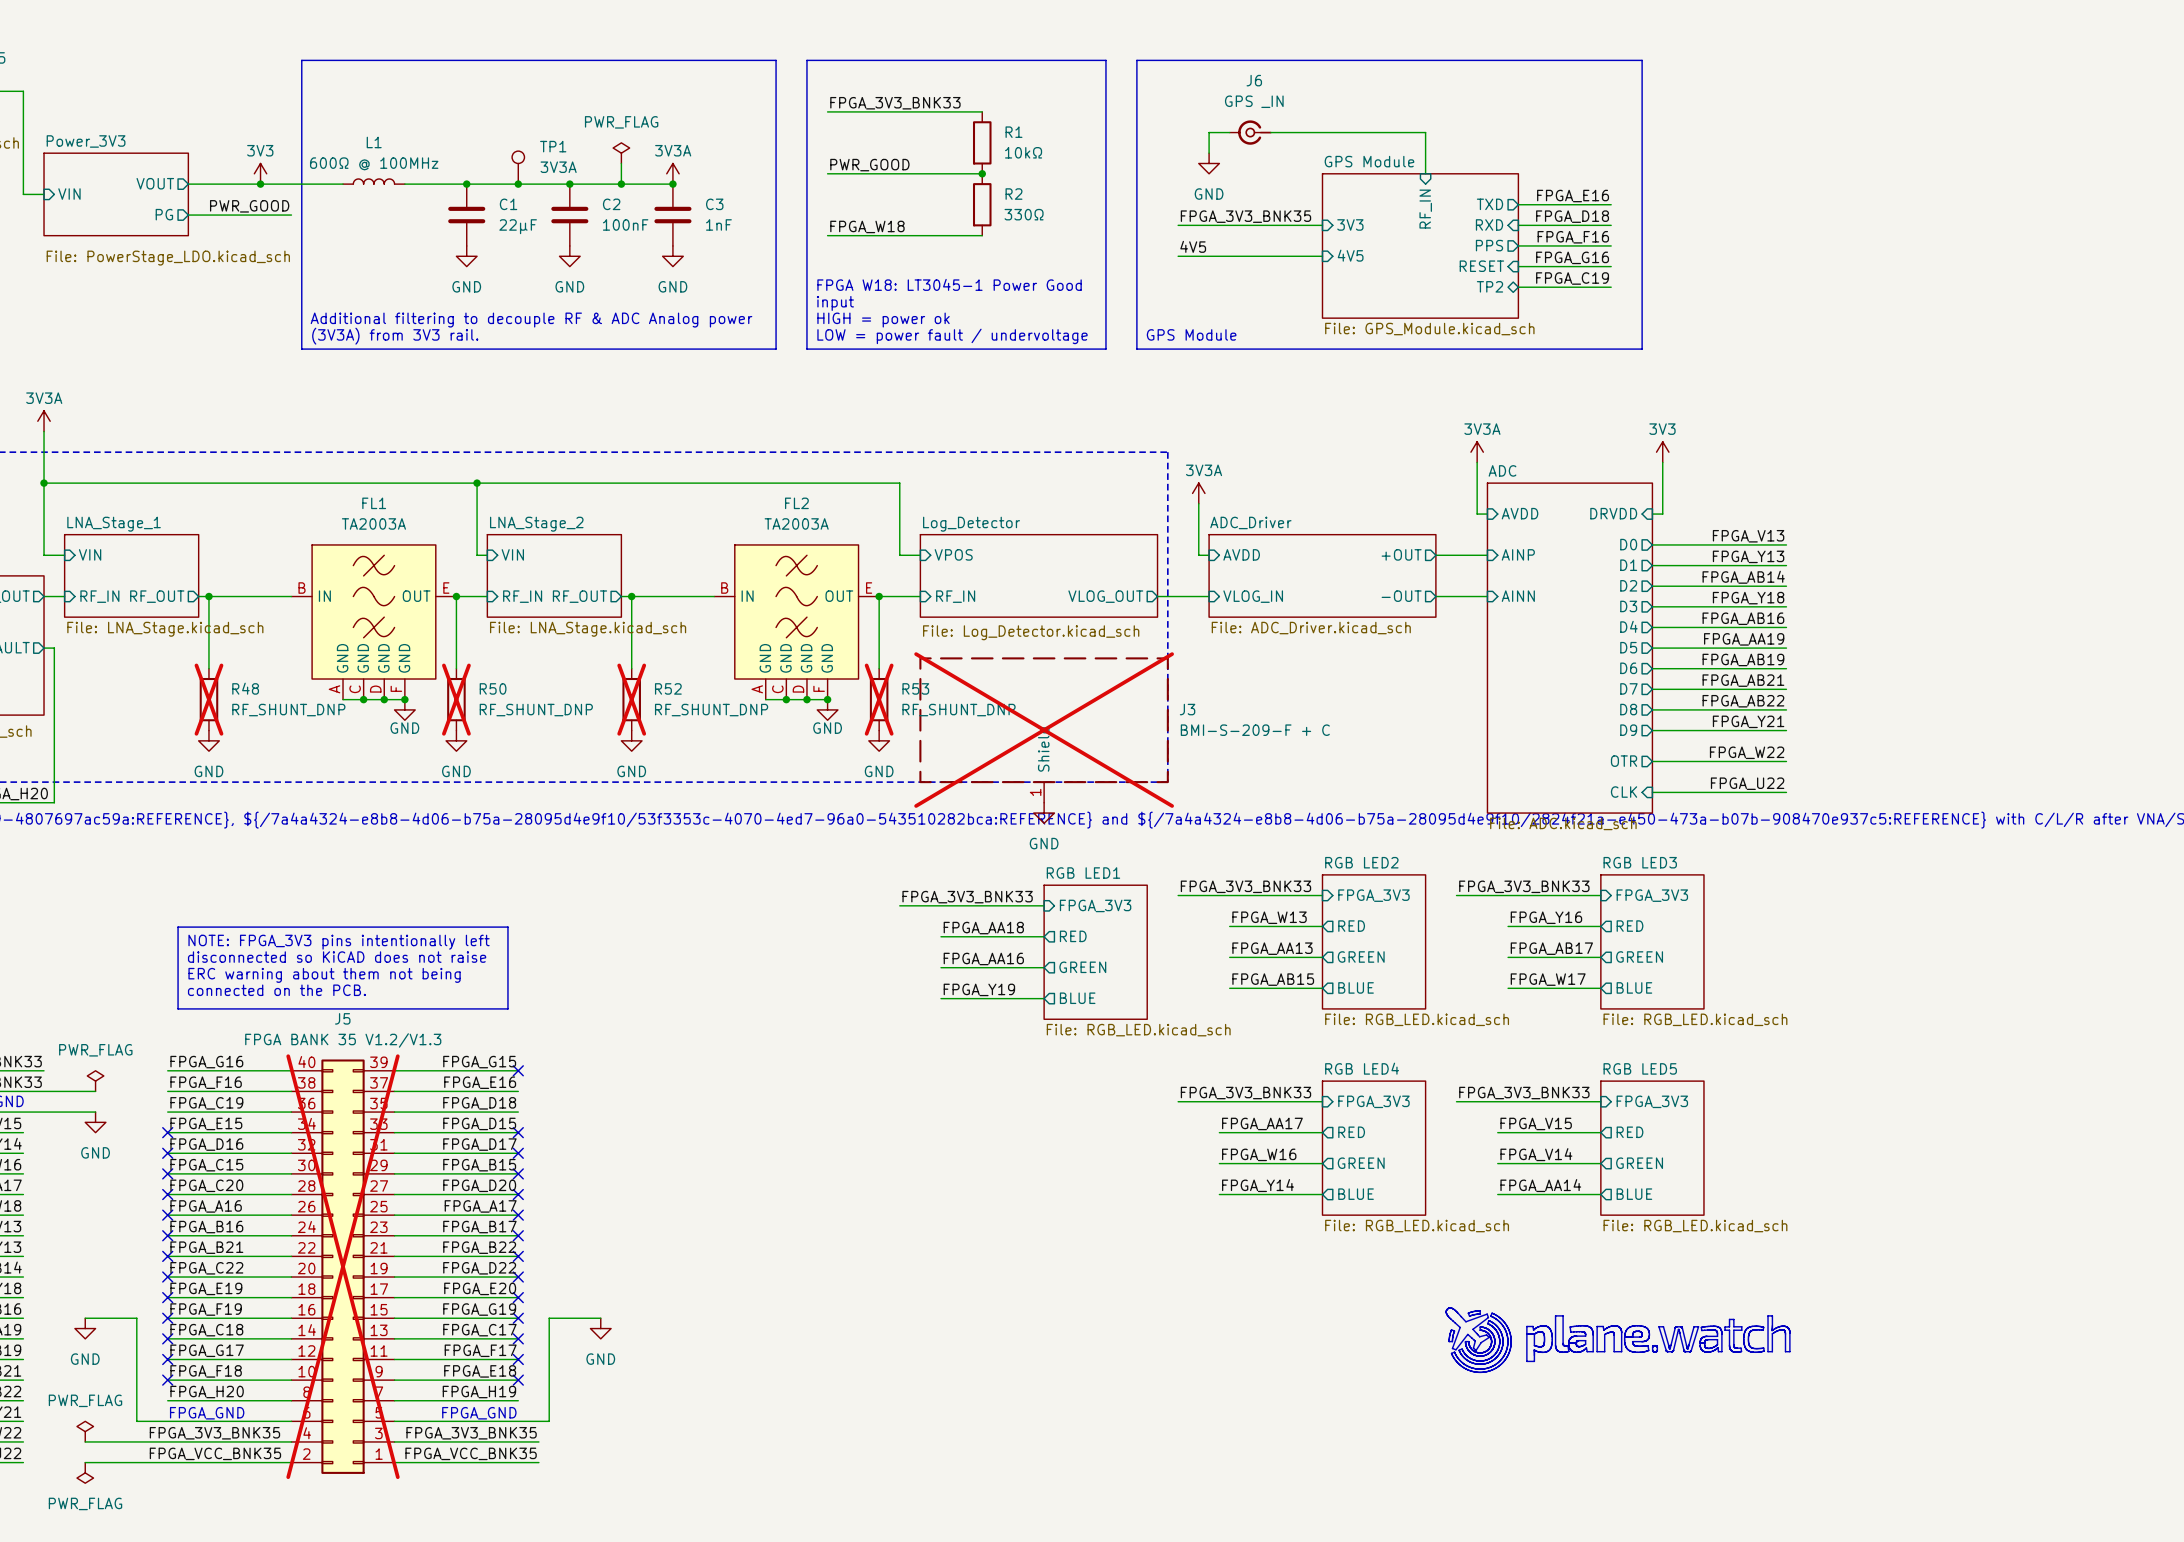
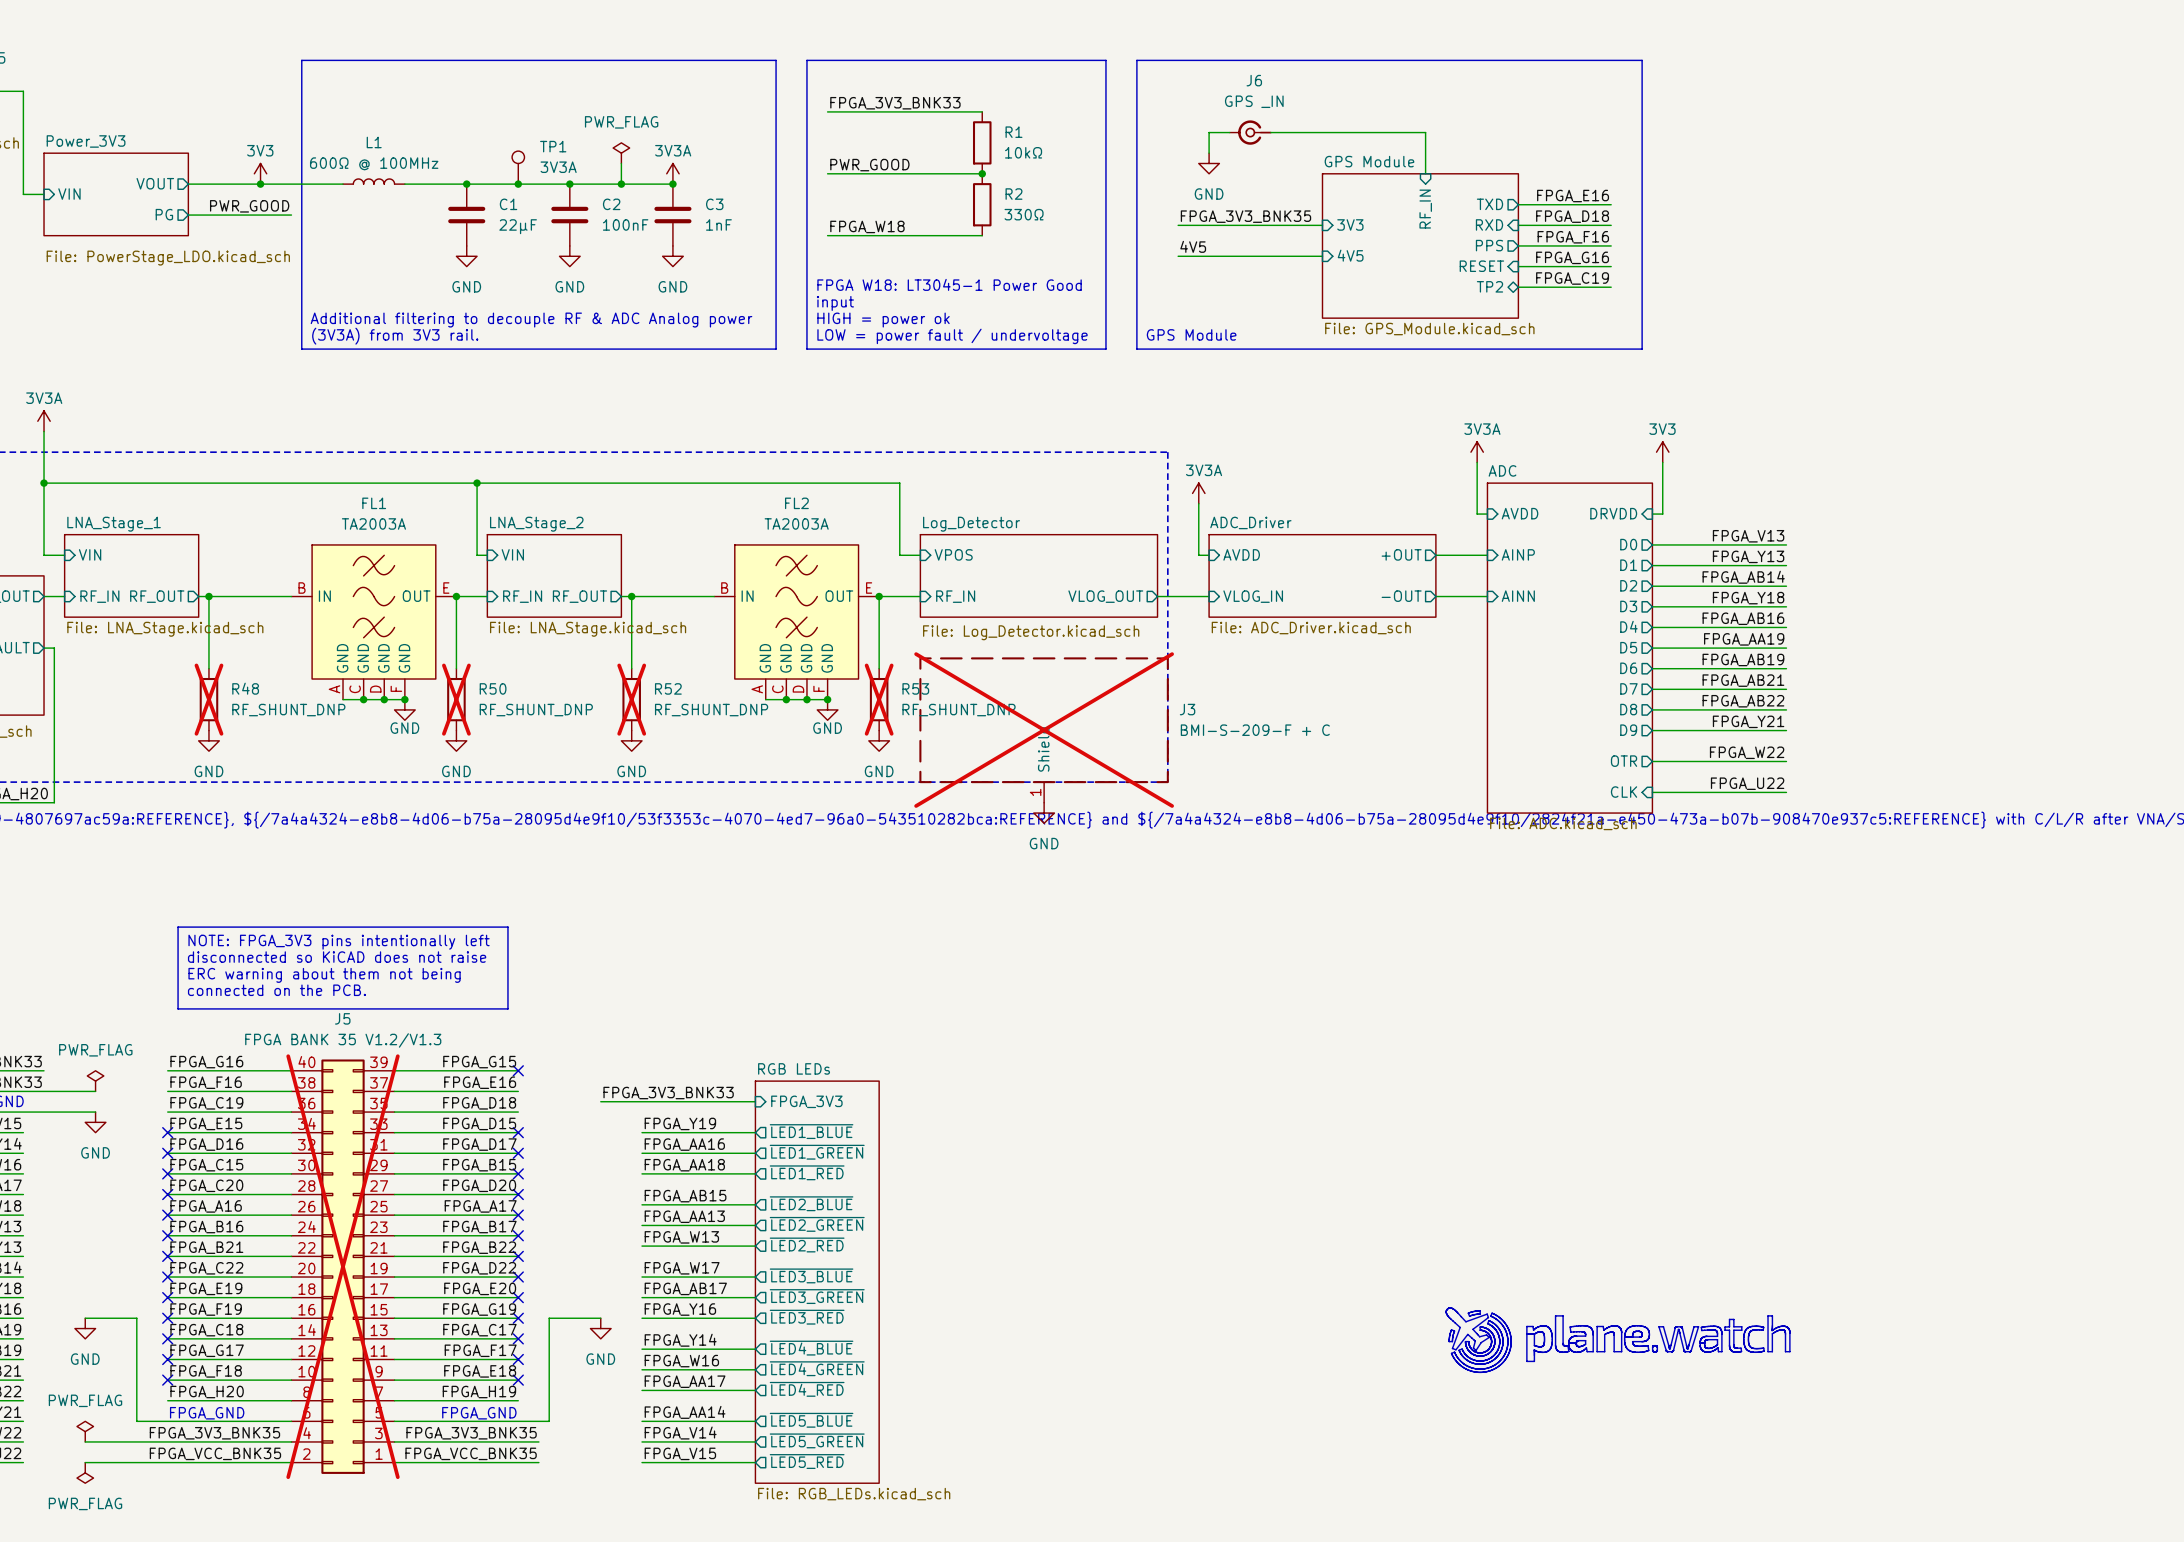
label: FPGA_3V3_BNK33 (1245, 886) -> none
label: FPGA_3V3_BNK33 (1524, 886) -> none
wire: (1178, 895) (1322, 895) -> none
sheet pin: FPGA_3V3 (1373, 895) -> none
wire: (1456, 895) (1600, 895) -> none
sheet pin: FPGA_3V3 (1652, 895) -> none
label: FPGA_3V3_BNK33 (967, 897) -> none
wire: (899, 905) (1044, 905) -> none
sheet pin: FPGA_3V3 (1095, 905) -> none
label: FPGA_W13 (1269, 917) -> none
label: FPGA_Y16 (1546, 917) -> none
wire: (1229, 926) (1322, 926) -> none
sheet pin: RED (1351, 926) -> none
wire: (1508, 926) (1600, 926) -> none
sheet pin: RED (1630, 926) -> none
label: FPGA_AA18 (983, 928) -> none
wire: (941, 936) (1044, 936) -> none
sheet pin: RED (1073, 936) -> none
sheet RGB LED2: File: RGB_LED.kicad_sch (1374, 941) -> none
sheet RGB LED3: File: RGB_LED.kicad_sch (1652, 941) -> none
label: FPGA_AA13 (1272, 948) -> none
label: FPGA_AB17 (1551, 948) -> none
sheet RGB LED1: File: RGB_LED.kicad_sch (1095, 952) -> none
wire: (1229, 957) (1322, 957) -> none
sheet pin: GREEN (1361, 957) -> none
wire: (1508, 957) (1600, 957) -> none
sheet pin: GREEN (1639, 957) -> none
label: FPGA_AA16 (983, 958) -> none
wire: (941, 967) (1044, 967) -> none
sheet pin: GREEN (1082, 967) -> none
label: FPGA_AB15 (1273, 979) -> none
label: FPGA_W17 (1548, 979) -> none
sheet pin: BLUE (1356, 987) -> none
sheet pin: BLUE (1634, 987) -> none
wire: (1229, 988) (1322, 988) -> none
wire: (1508, 988) (1600, 988) -> none
label: FPGA_Y19 (979, 989) -> none
wire: (941, 998) (1044, 998) -> none
sheet pin: BLUE (1077, 998) -> none
label: none -> FPGA_3V3_BNK33 (668, 1093)
label: FPGA_3V3_BNK33 (1245, 1093) -> none
label: FPGA_3V3_BNK33 (1524, 1093) -> none
wire: none -> (600, 1101) (755, 1101)
sheet pin: none -> FPGA_3V3 (806, 1101)
wire: (1178, 1101) (1322, 1101) -> none
sheet pin: FPGA_3V3 (1373, 1101) -> none
wire: (1456, 1101) (1600, 1101) -> none
sheet pin: FPGA_3V3 (1652, 1101) -> none
label: none -> FPGA_Y19 (680, 1123)
label: FPGA_AA17 (1262, 1123) -> none
label: FPGA_V15 (1536, 1123) -> none
sheet pin: none -> ~{LED1_BLUE} (811, 1131)
wire: none -> (642, 1132) (755, 1132)
wire: (1219, 1132) (1322, 1132) -> none
sheet pin: RED (1351, 1132) -> none
wire: (1497, 1132) (1600, 1132) -> none
sheet pin: RED (1630, 1132) -> none
label: none -> FPGA_AA16 (684, 1144)
sheet RGB LED4: File: RGB_LED.kicad_sch (1374, 1148) -> none
sheet RGB LED5: File: RGB_LED.kicad_sch (1652, 1148) -> none
sheet pin: none -> ~{LED1_GREEN} (817, 1152)
wire: none -> (642, 1153) (755, 1153)
label: FPGA_W16 (1259, 1154) -> none
label: FPGA_V14 (1536, 1154) -> none
wire: (1219, 1163) (1322, 1163) -> none
sheet pin: GREEN (1361, 1163) -> none
wire: (1497, 1163) (1600, 1163) -> none
sheet pin: GREEN (1639, 1163) -> none
label: none -> FPGA_AA18 (684, 1165)
sheet pin: none -> ~{LED1_RED} (807, 1172)
wire: none -> (642, 1173) (755, 1173)
label: FPGA_Y14 (1258, 1185) -> none
label: FPGA_AA14 (1540, 1185) -> none
wire: (1219, 1194) (1322, 1194) -> none
sheet pin: BLUE (1356, 1194) -> none
wire: (1497, 1194) (1600, 1194) -> none
sheet pin: BLUE (1634, 1194) -> none
label: none -> FPGA_AB15 (685, 1196)
sheet pin: none -> ~{LED2_BLUE} (811, 1203)
wire: none -> (642, 1204) (755, 1204)
label: none -> FPGA_AA13 (684, 1216)
sheet pin: none -> ~{LED2_GREEN} (817, 1224)
wire: none -> (642, 1225) (755, 1225)
label: none -> FPGA_W13 (681, 1237)
sheet pin: none -> ~{LED2_RED} (807, 1244)
wire: none -> (642, 1246) (755, 1246)
label: none -> FPGA_W17 (682, 1268)
sheet pin: none -> ~{LED3_BLUE} (811, 1275)
wire: none -> (642, 1277) (755, 1277)
sheet RGB LEDs: none -> File: RGB_LEDs.kicad_sch (817, 1282)
label: none -> FPGA_AB17 (685, 1288)
sheet pin: none -> ~{LED3_GREEN} (817, 1296)
wire: none -> (642, 1297) (755, 1297)
label: none -> FPGA_Y16 (680, 1309)
sheet pin: none -> ~{LED3_RED} (807, 1317)
wire: none -> (642, 1318) (755, 1318)
label: none -> FPGA_Y14 (680, 1340)
sheet pin: none -> ~{LED4_BLUE} (811, 1348)
wire: none -> (642, 1349) (755, 1349)
label: none -> FPGA_W16 (681, 1361)
sheet pin: none -> ~{LED4_GREEN} (817, 1368)
wire: none -> (642, 1369) (755, 1369)
label: none -> FPGA_AA17 (685, 1381)
sheet pin: none -> ~{LED4_RED} (807, 1389)
wire: none -> (642, 1390) (755, 1390)
label: none -> FPGA_AA14 (685, 1412)
sheet pin: none -> ~{LED5_BLUE} (811, 1420)
wire: none -> (642, 1421) (755, 1421)
label: none -> FPGA_V14 (680, 1433)
sheet pin: none -> ~{LED5_GREEN} (817, 1440)
wire: none -> (642, 1441) (755, 1441)
label: none -> FPGA_V15 (680, 1453)
sheet pin: none -> ~{LED5_RED} (807, 1461)
wire: none -> (642, 1462) (755, 1462)

